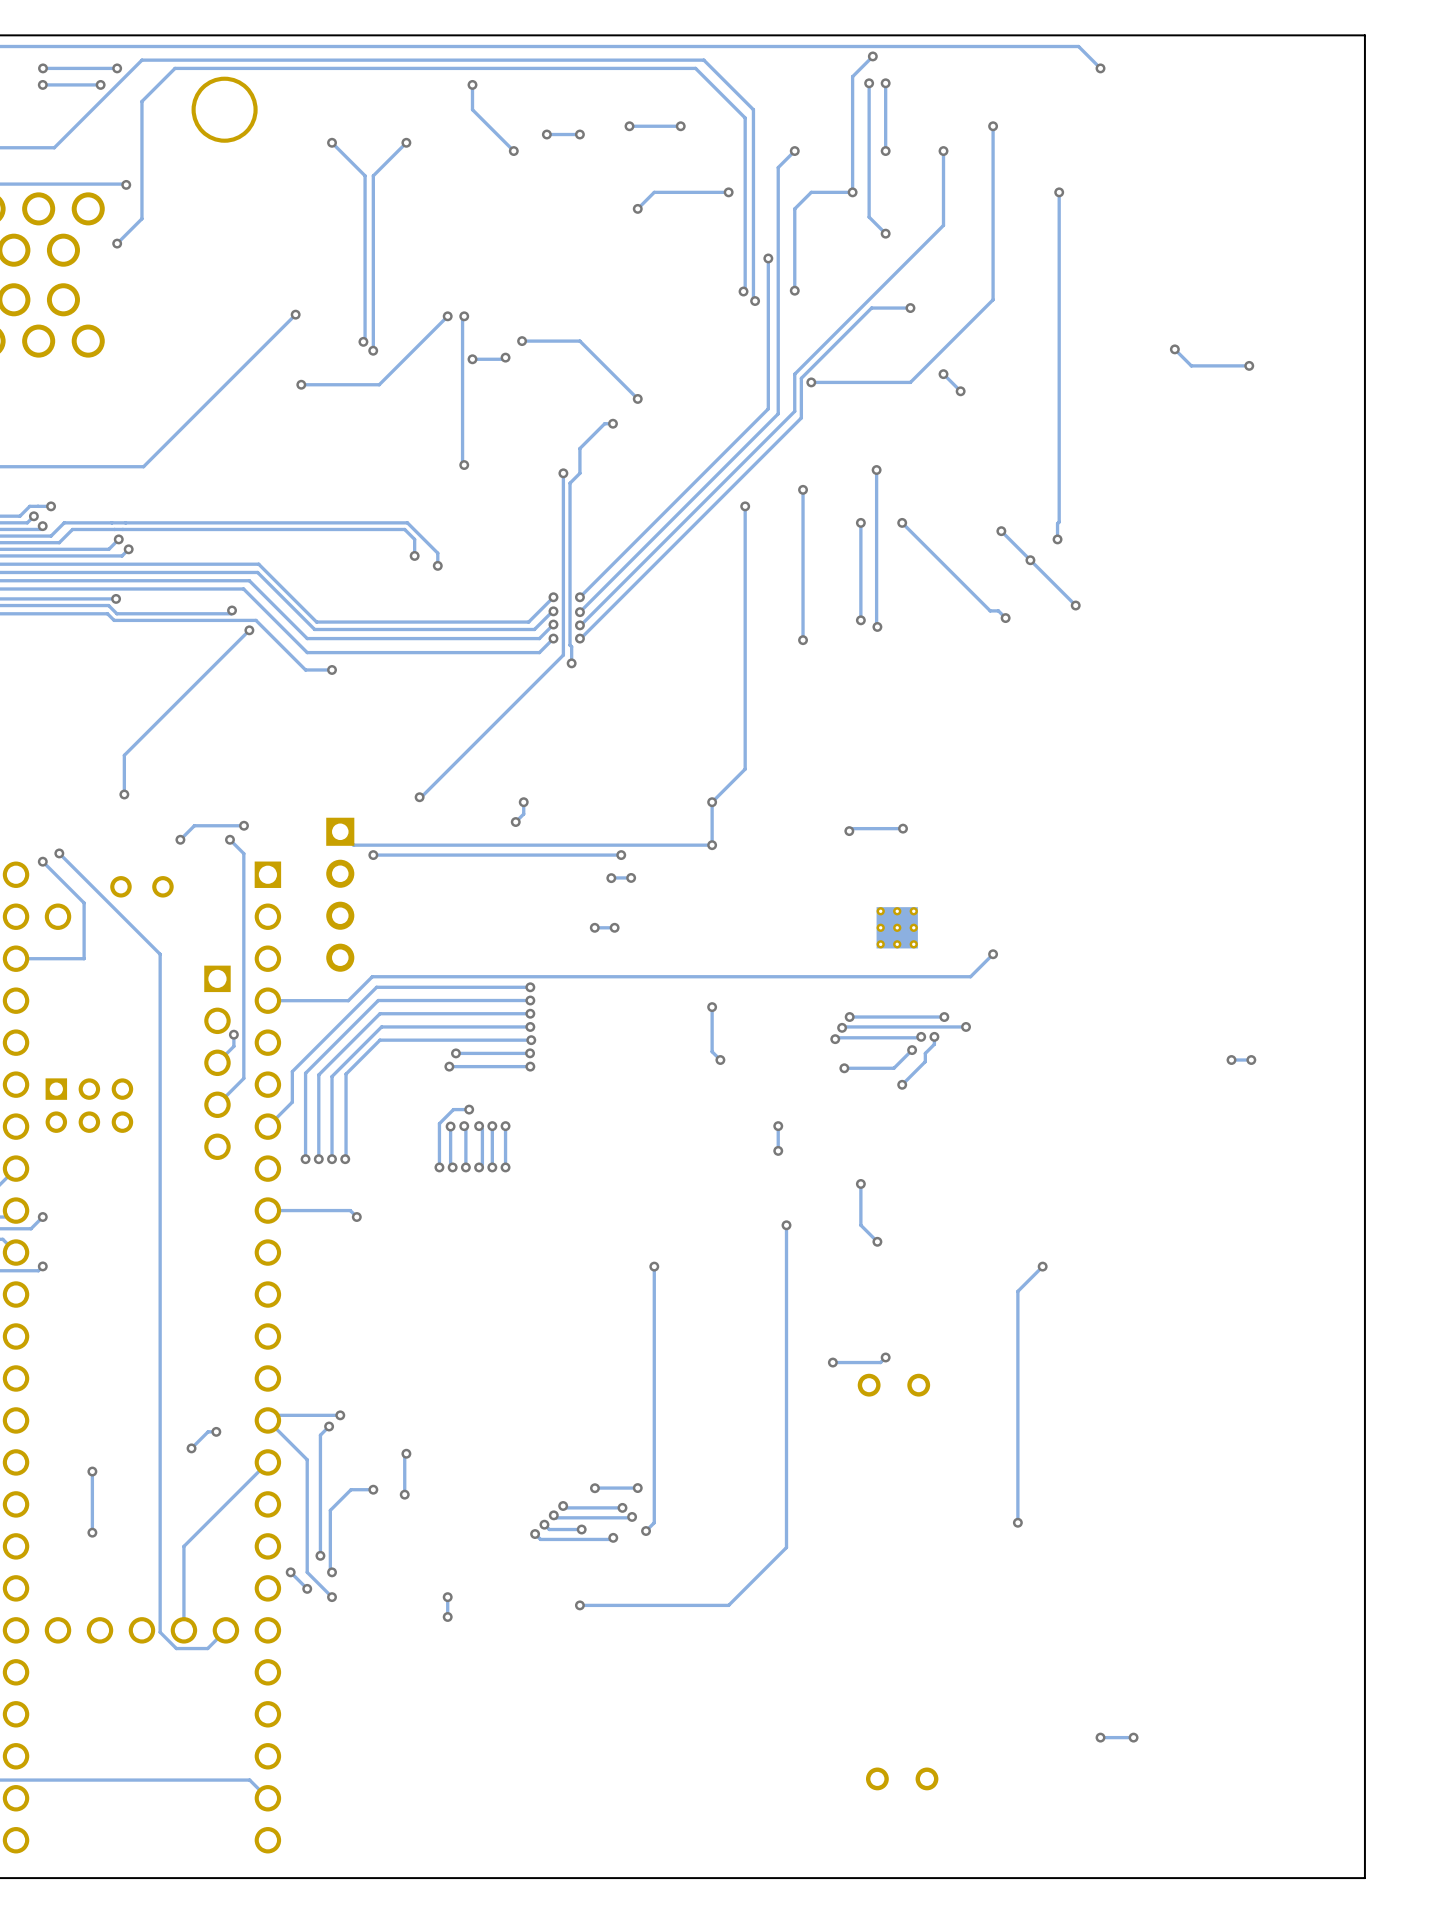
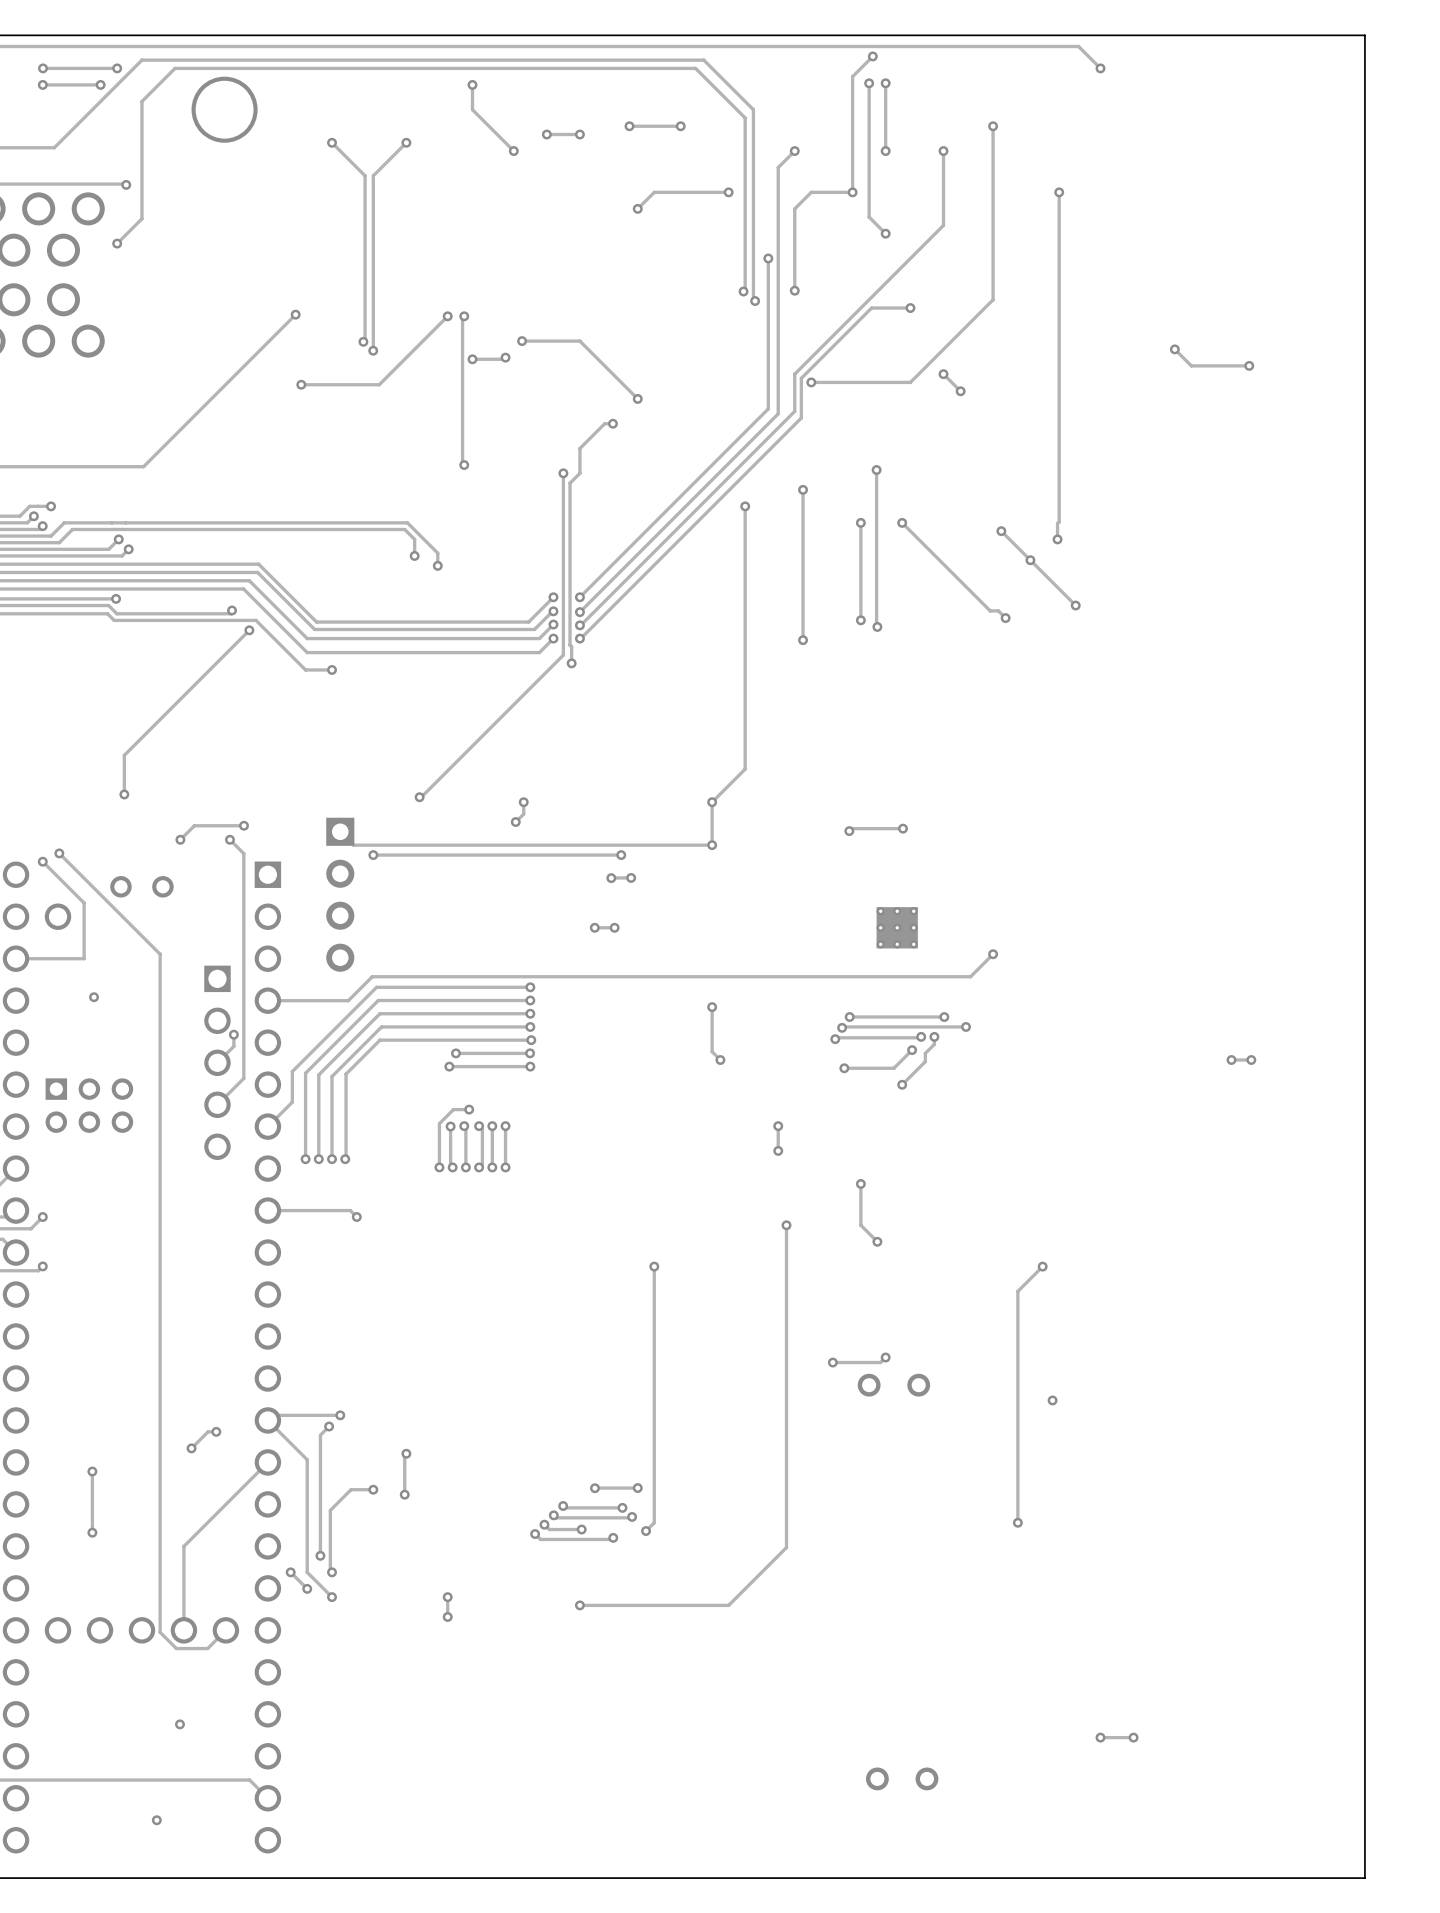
via: none -> (94, 997)
via: none -> (1052, 1400)
via: none -> (179, 1724)
via: none -> (156, 1820)

